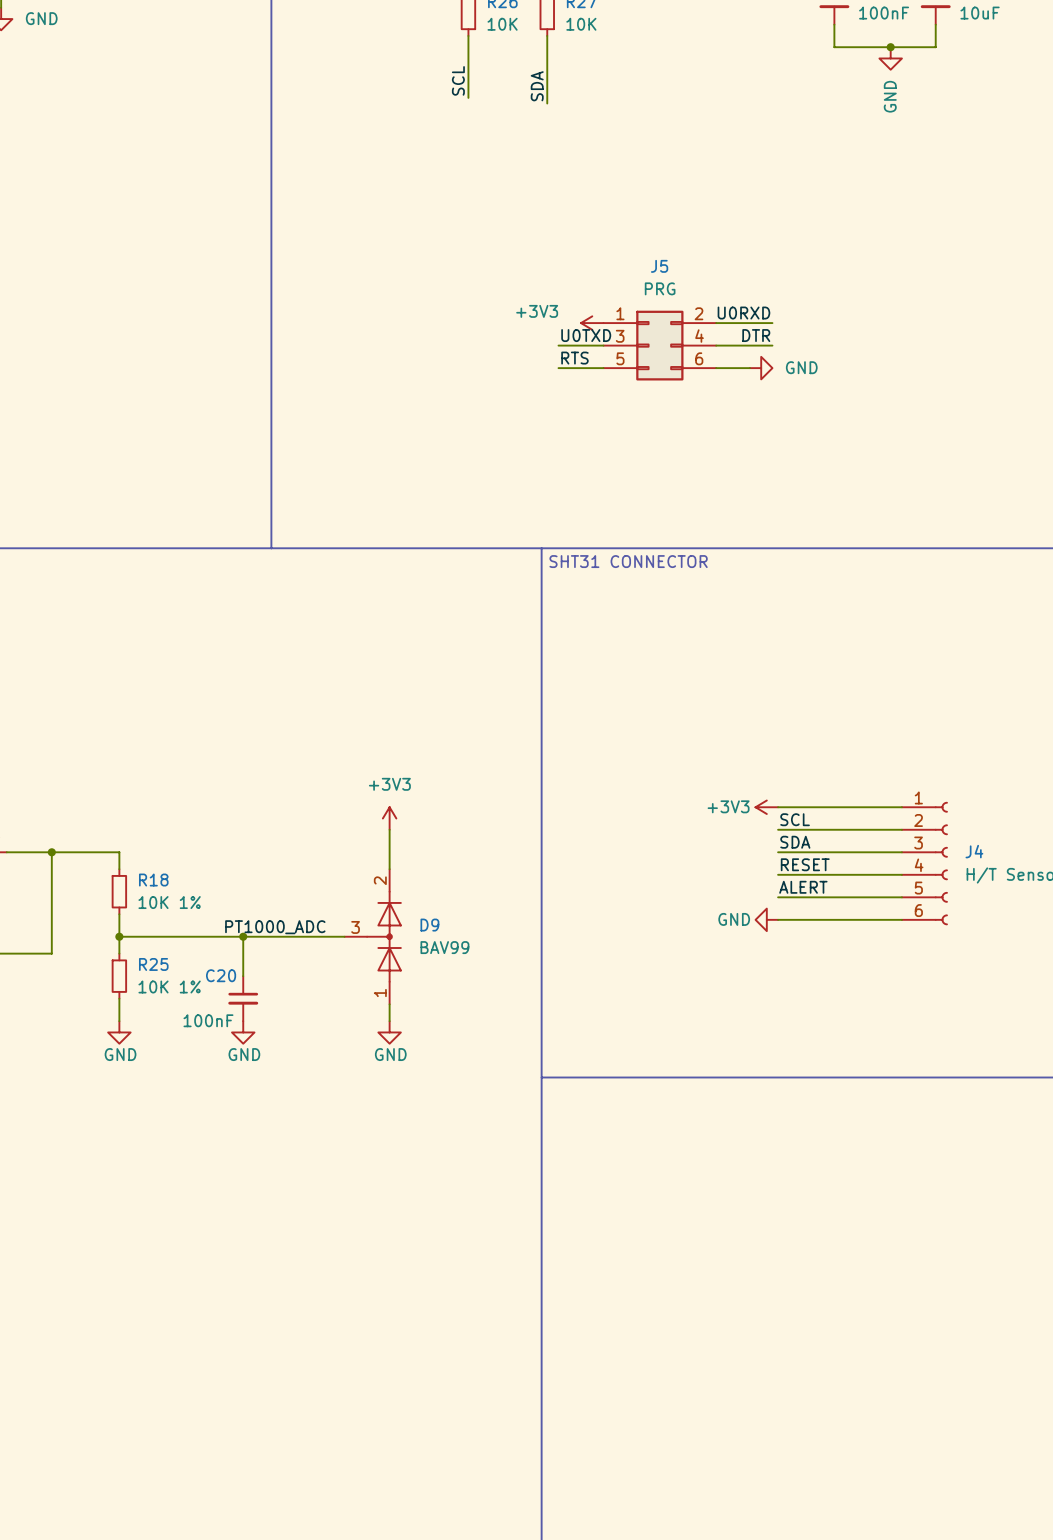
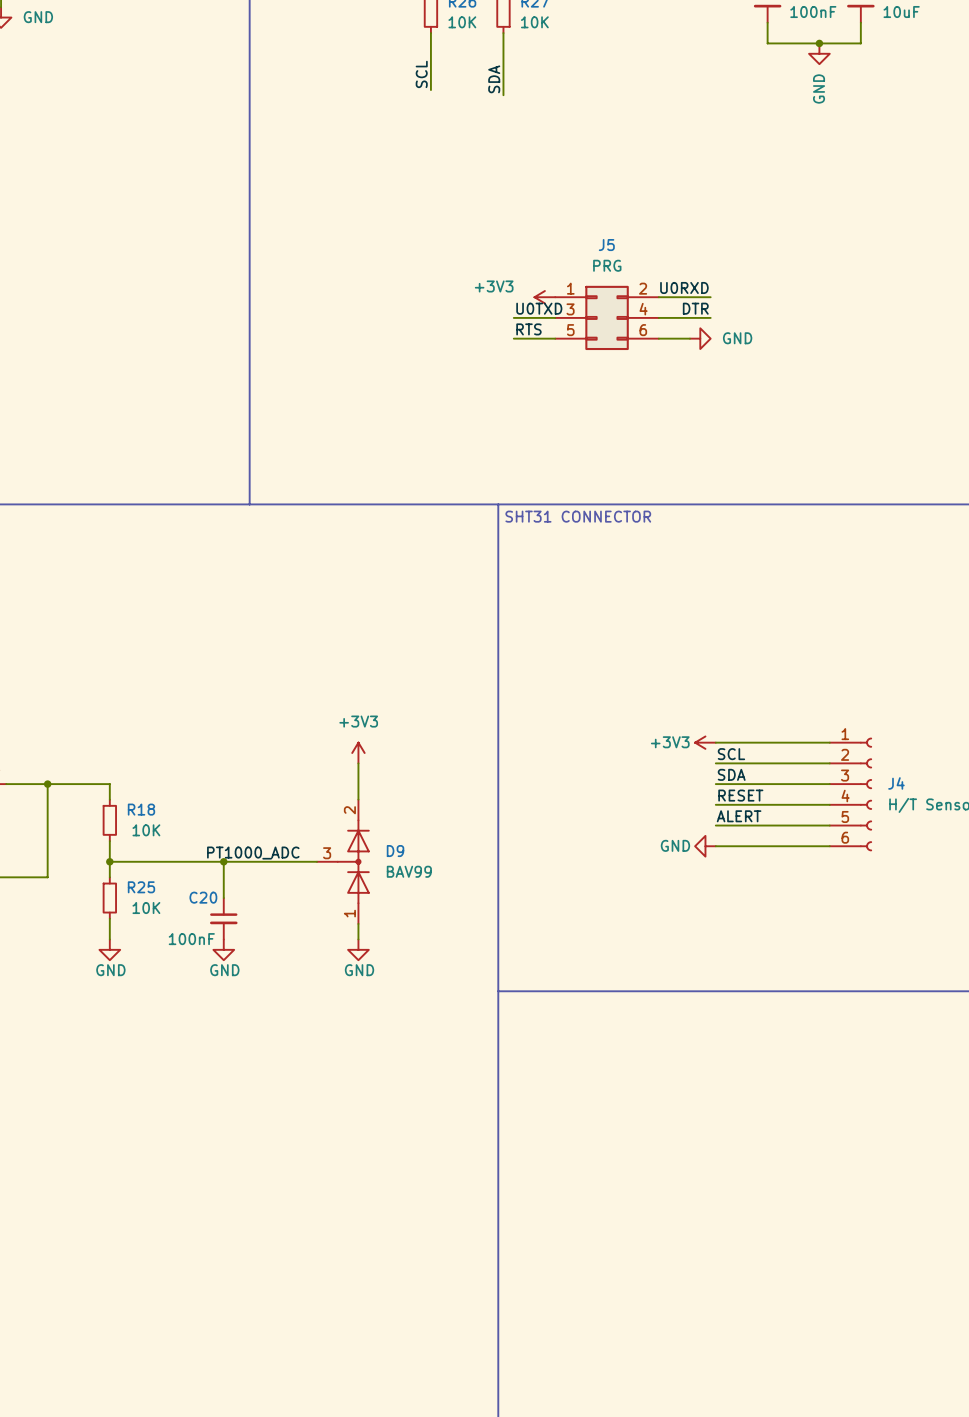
R18 value: 10K 1% (169, 902) -> 10K (146, 830)
R25 value: 10K 1% (169, 986) -> 10K (146, 908)

